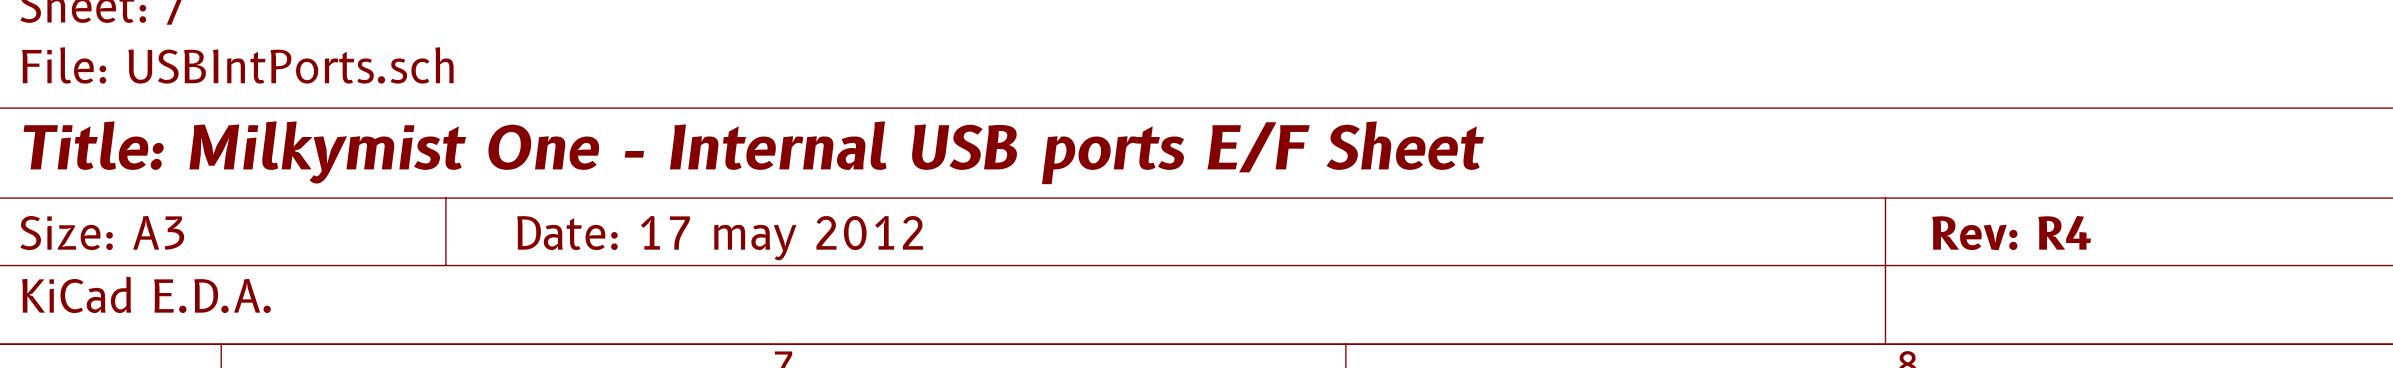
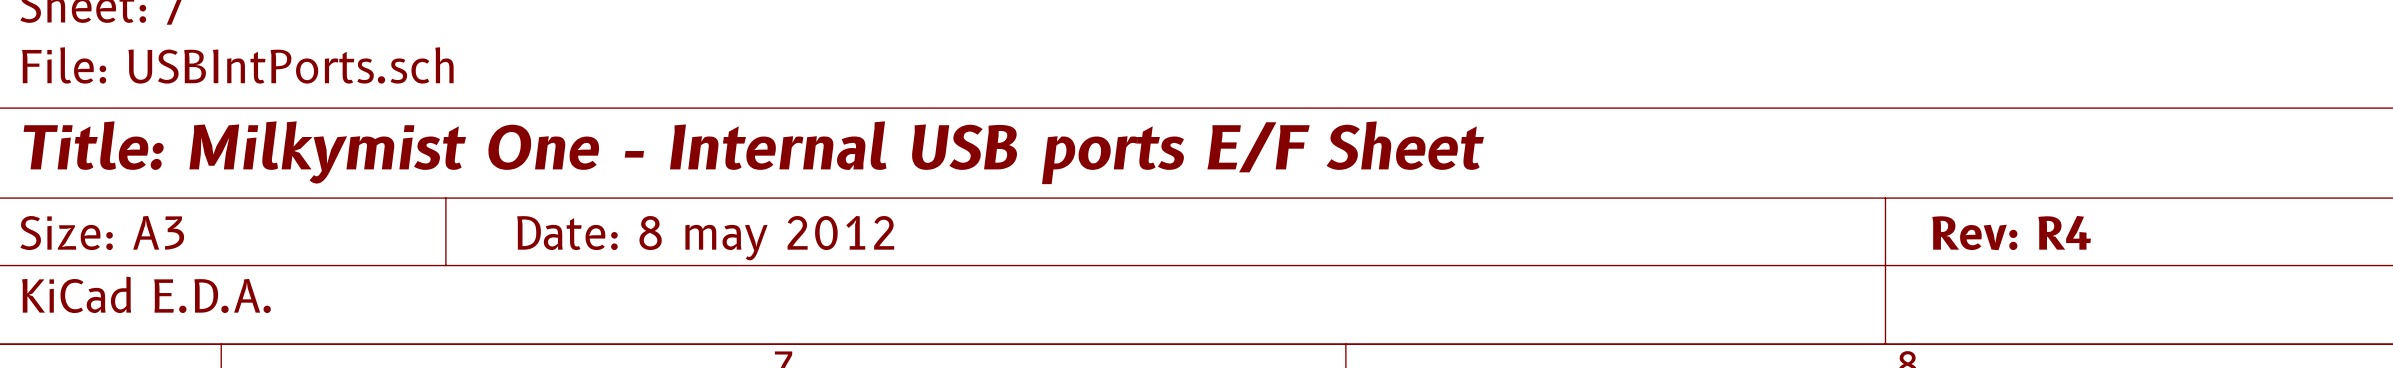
title block: Date: 17 may 2012 (720, 238) -> Date: 8 may 2012 (705, 238)

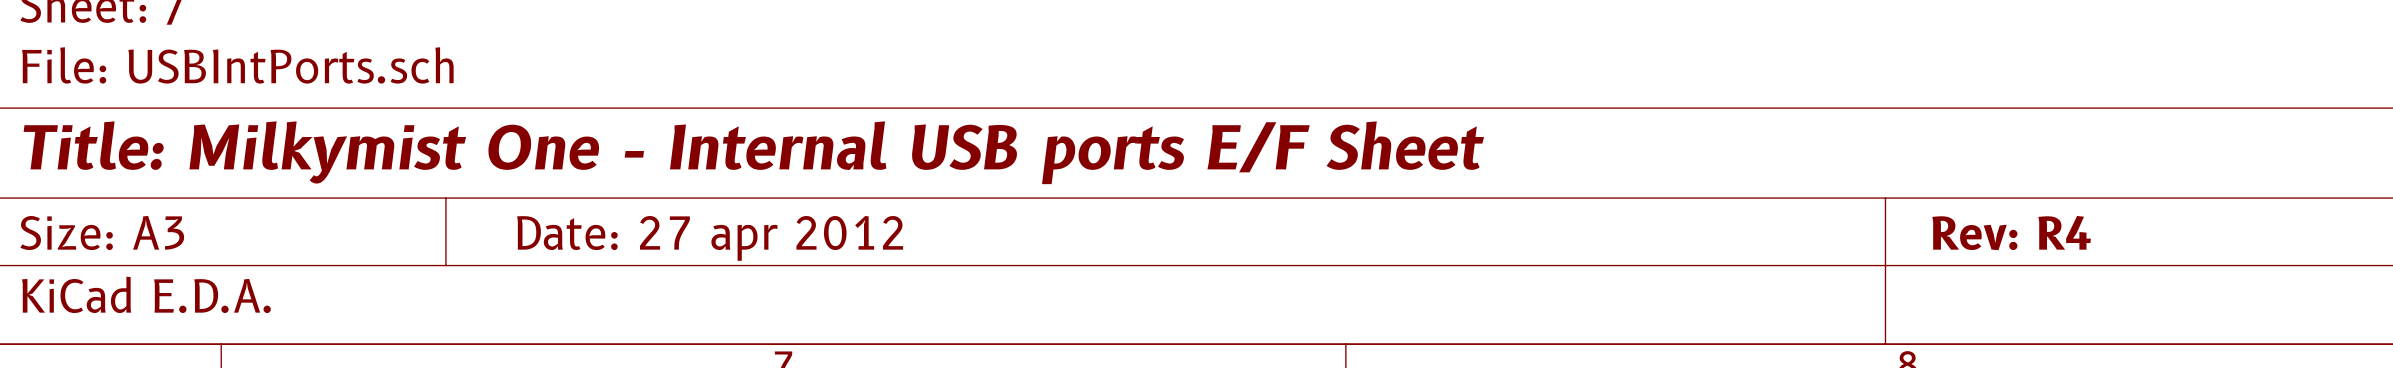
title block: Date: 8 may 2012 (705, 238) -> Date: 27 apr 2012 (710, 238)

